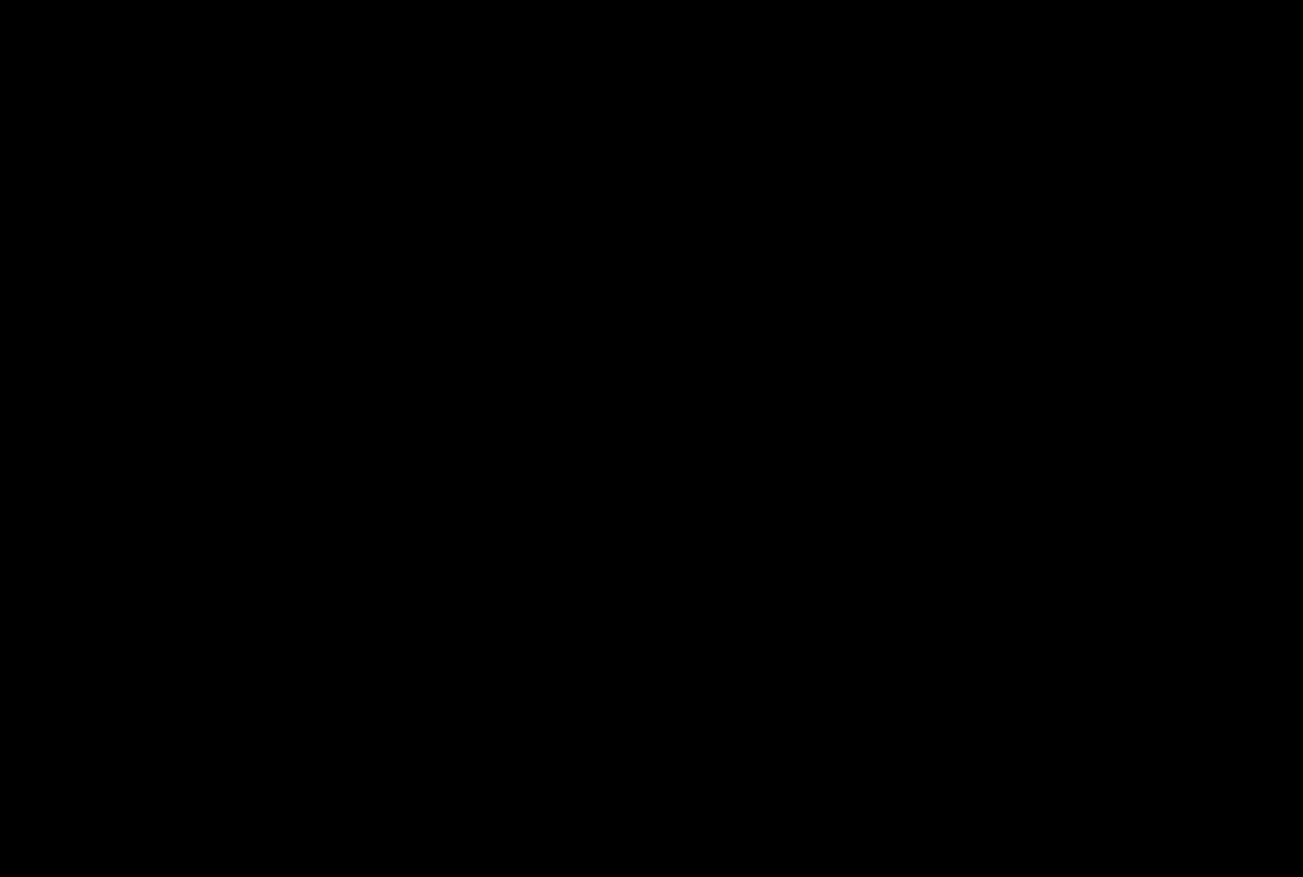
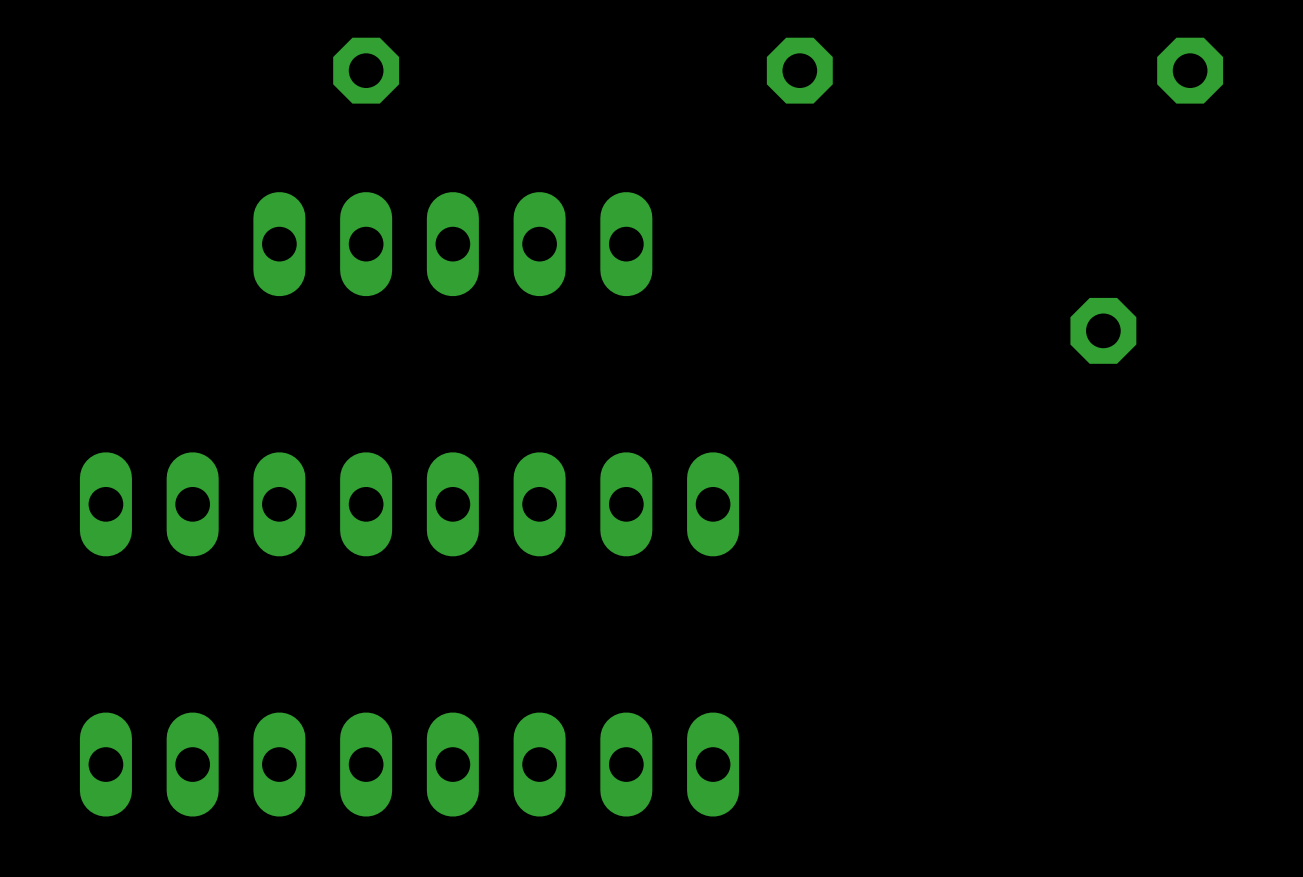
part: none -> (366, 70)
part: none -> (799, 70)
part: none -> (1190, 70)
part: none -> (452, 244)
part: none -> (1103, 330)
part: none -> (409, 504)
part: none -> (409, 764)

